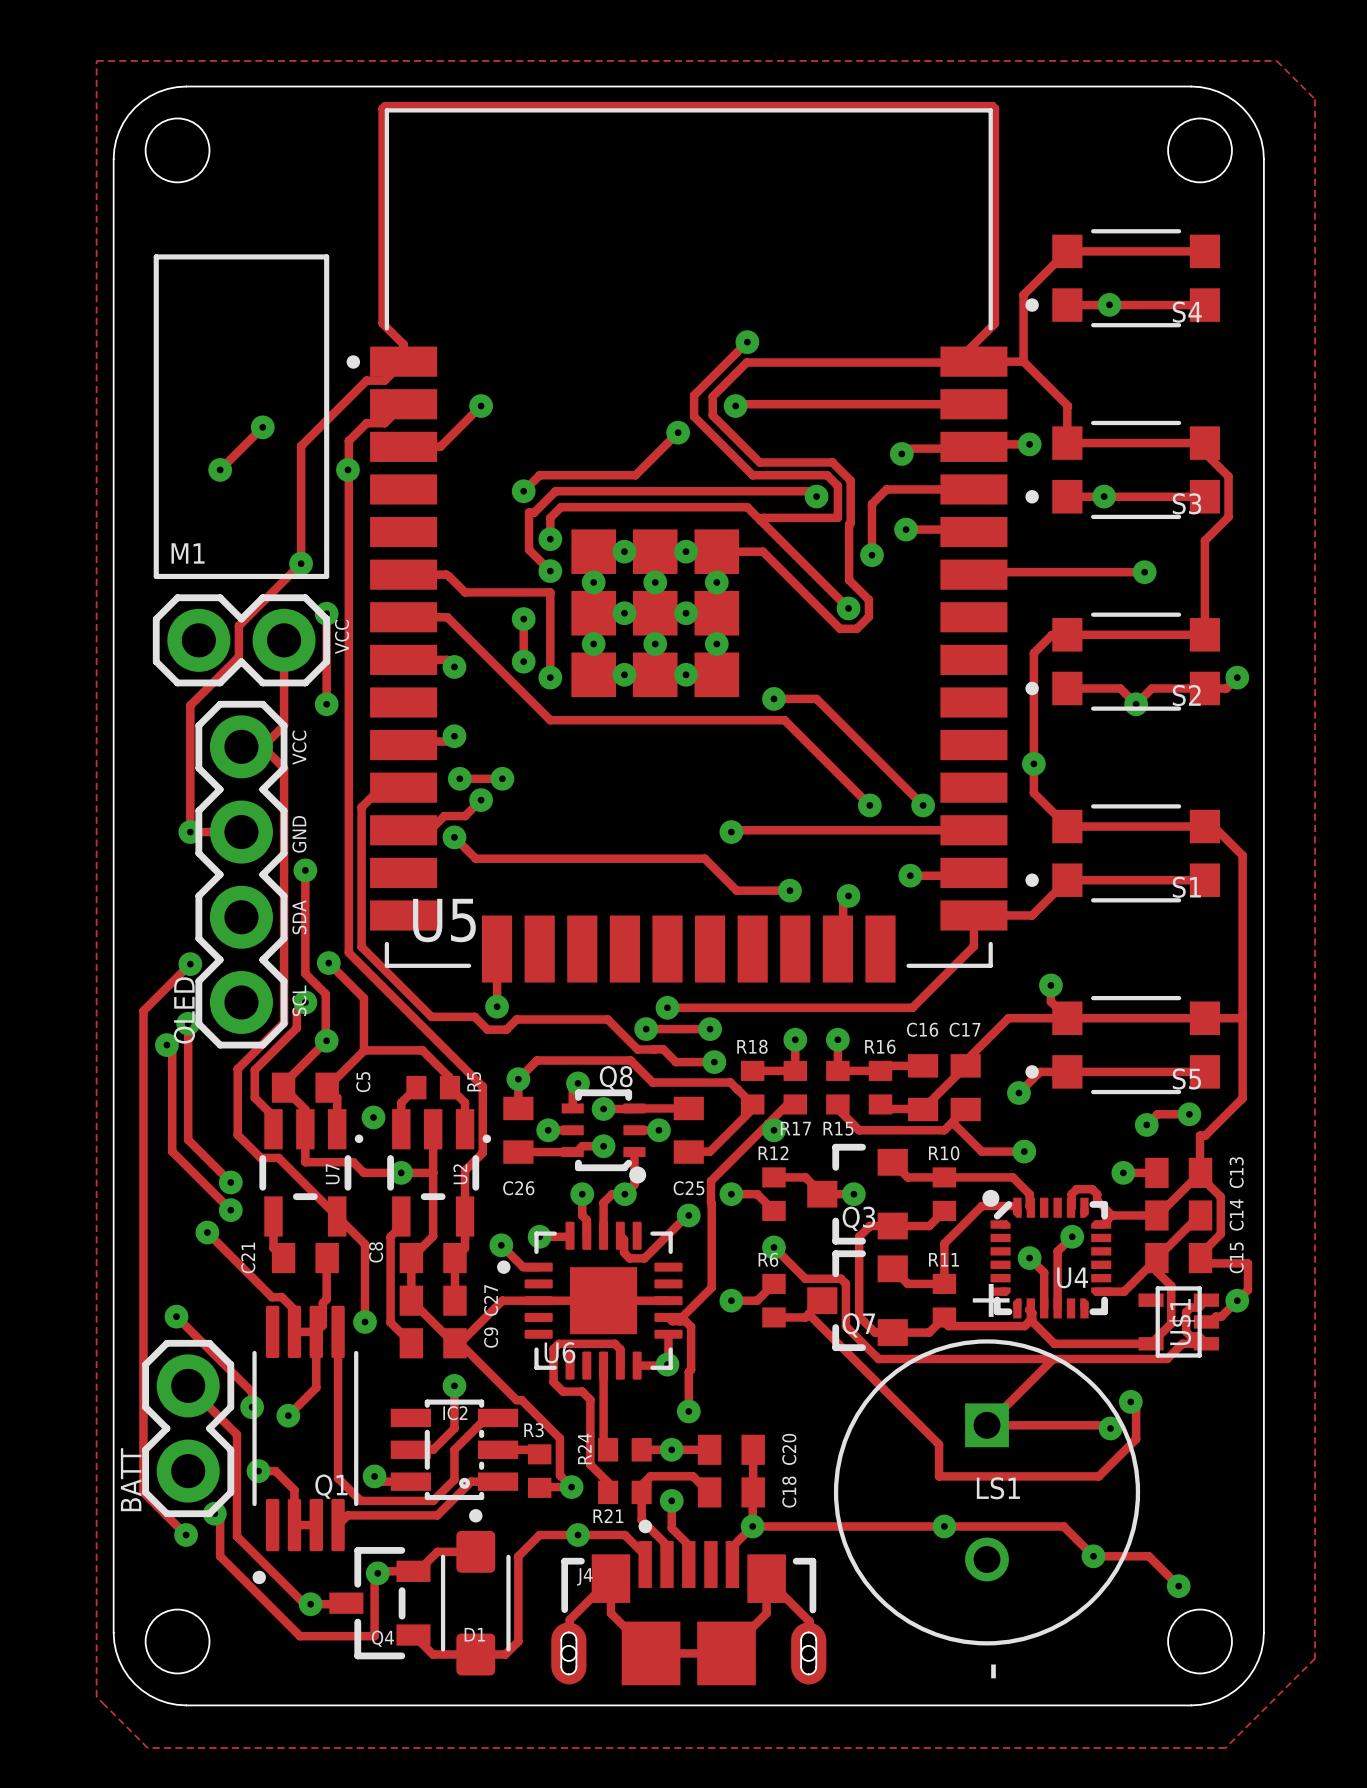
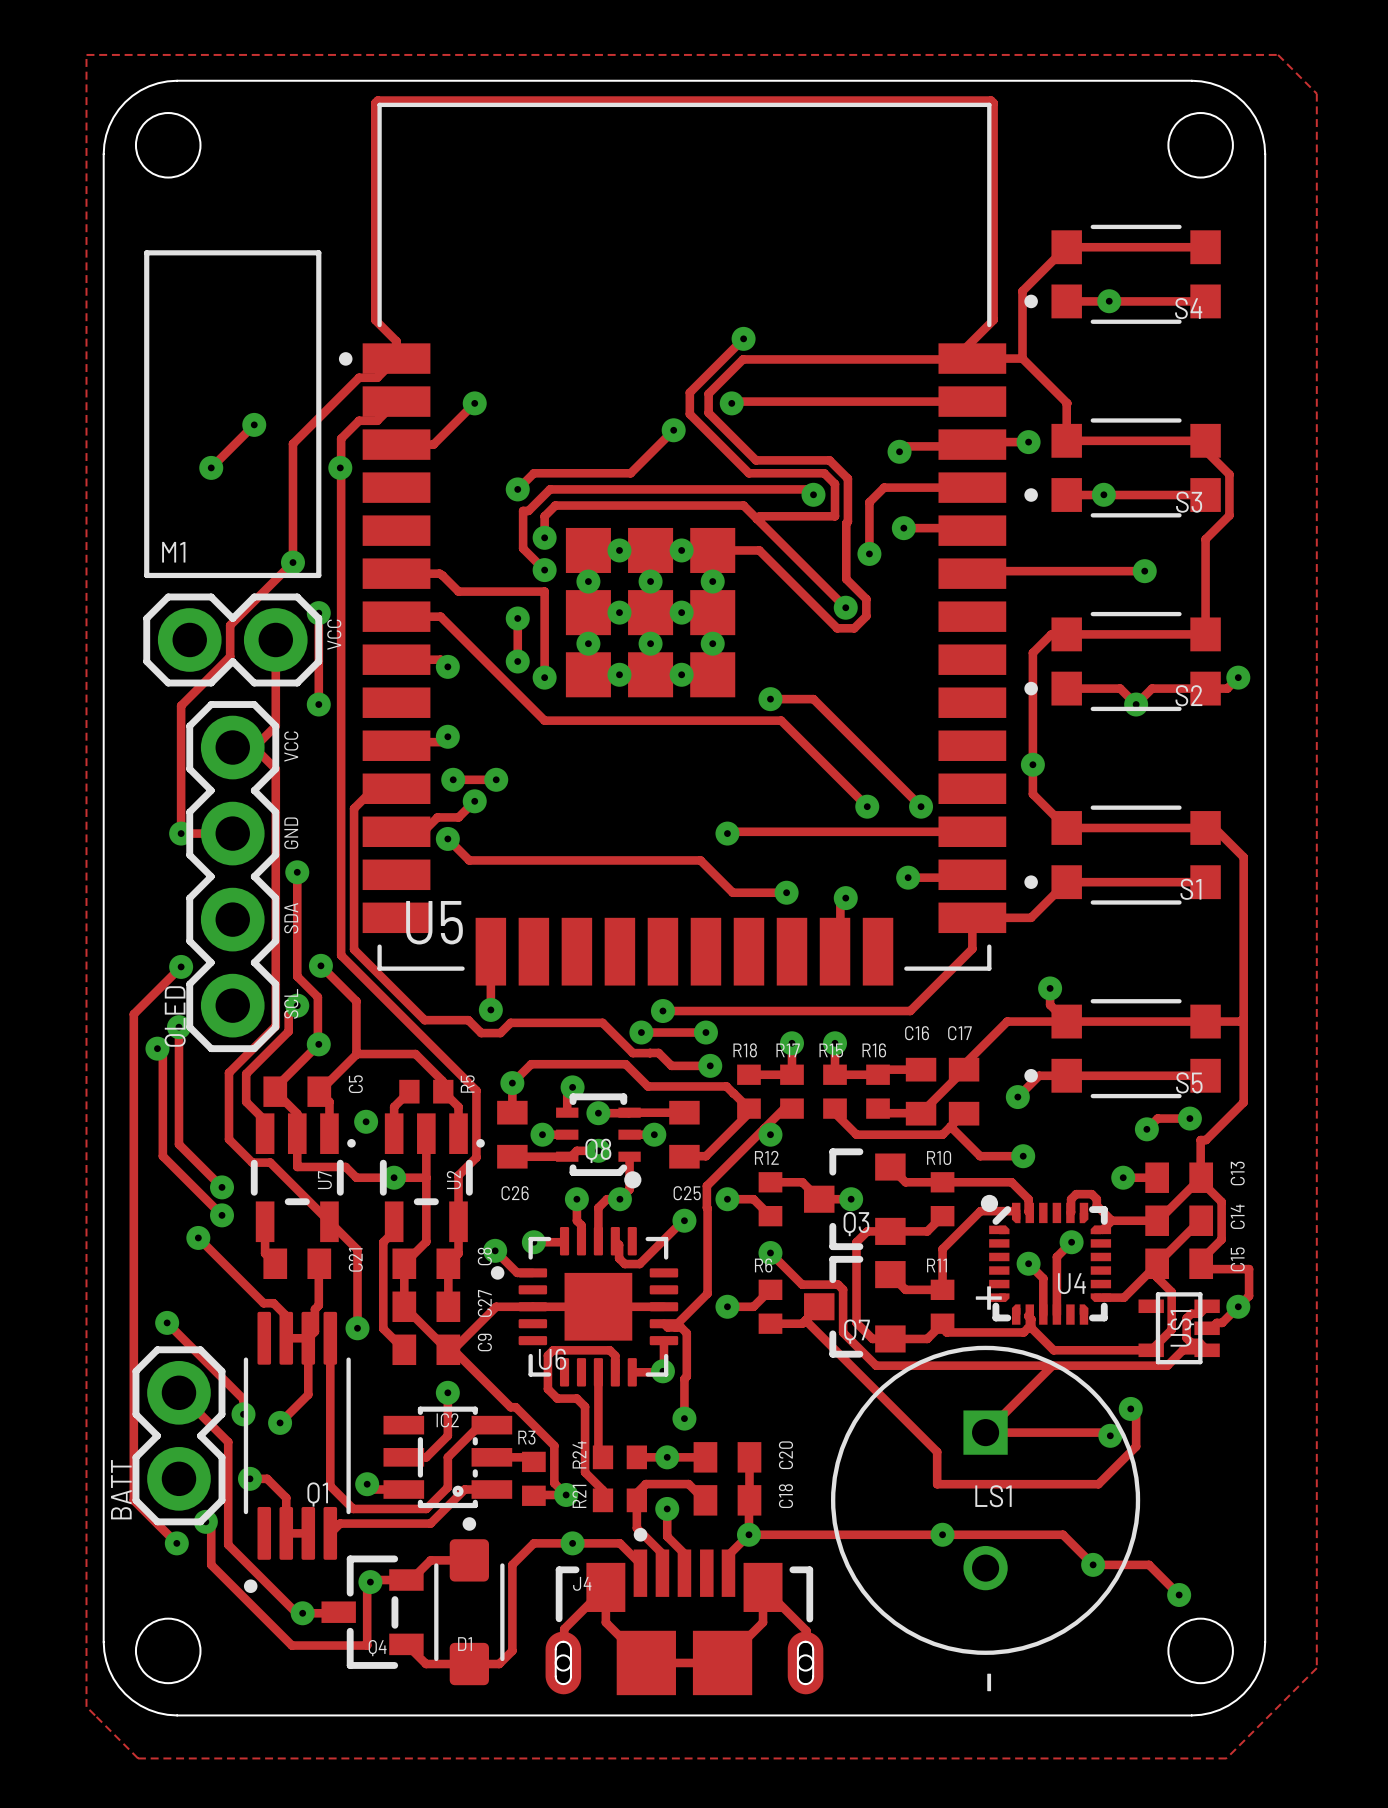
Q8 name position: Q8 (616, 1078) -> Q8 (598, 1150)
R17 name position: R17 (795, 1128) -> R17 (788, 1050)
R15 name position: R15 (838, 1128) -> R15 (831, 1050)
C8 name position: C8 (376, 1252) -> C8 (484, 1256)
C21 name position: C21 (248, 1257) -> C21 (355, 1259)
R21 name rotation: 0° (608, 1516) -> 90° counterclockwise (579, 1496)

